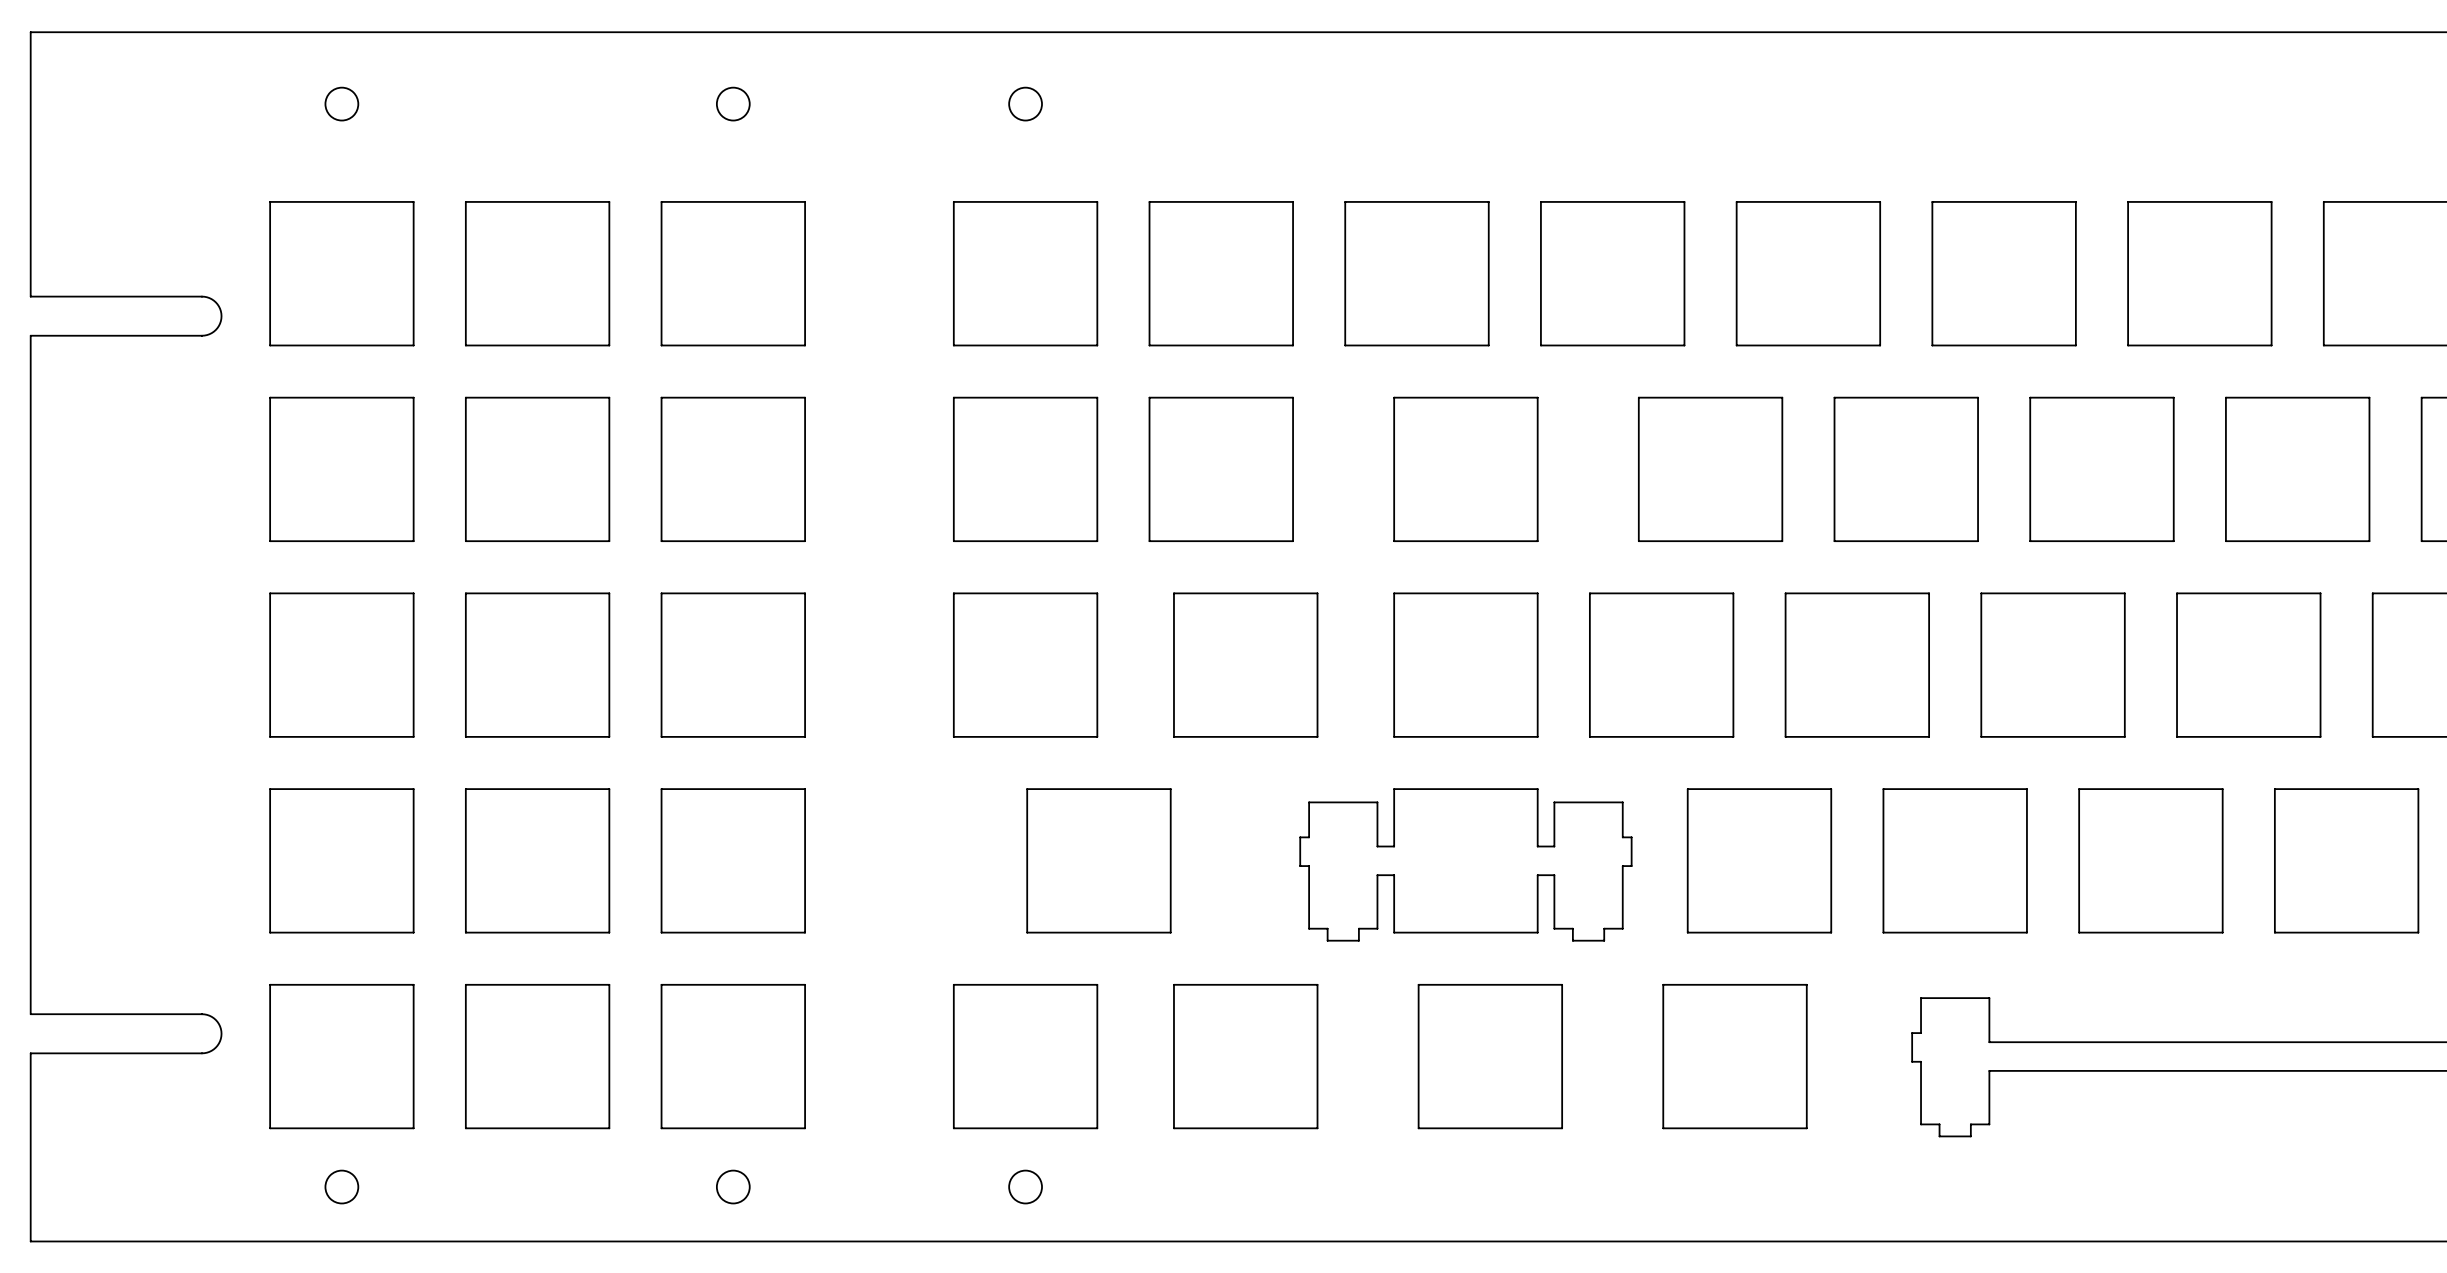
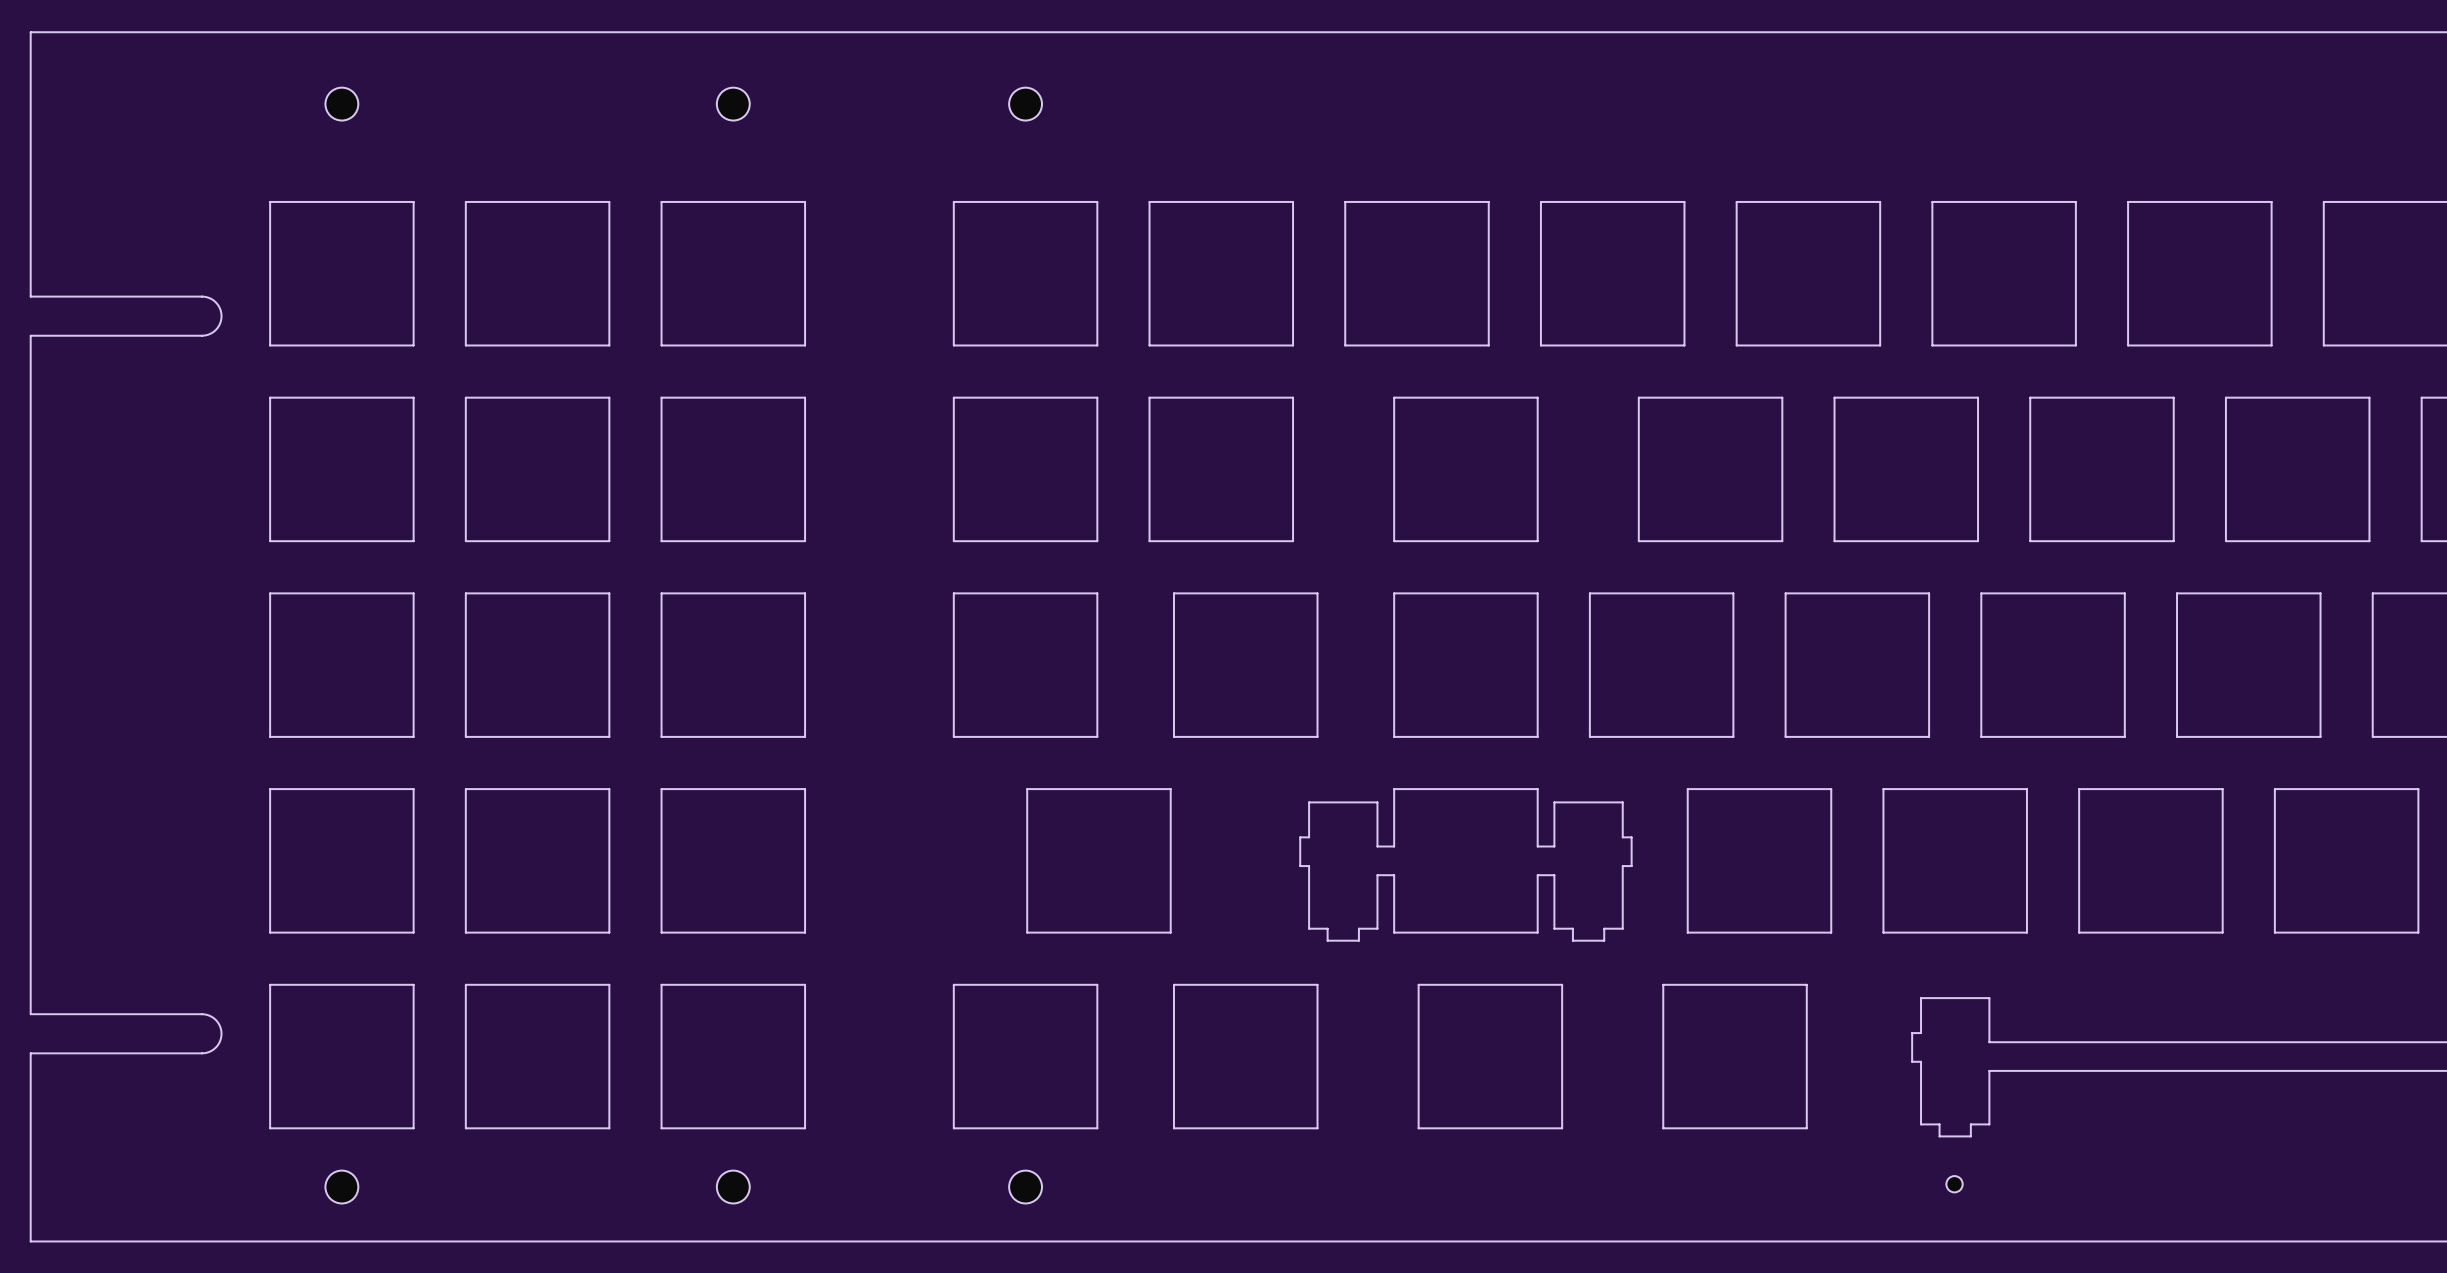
part: none -> (1954, 1184)

